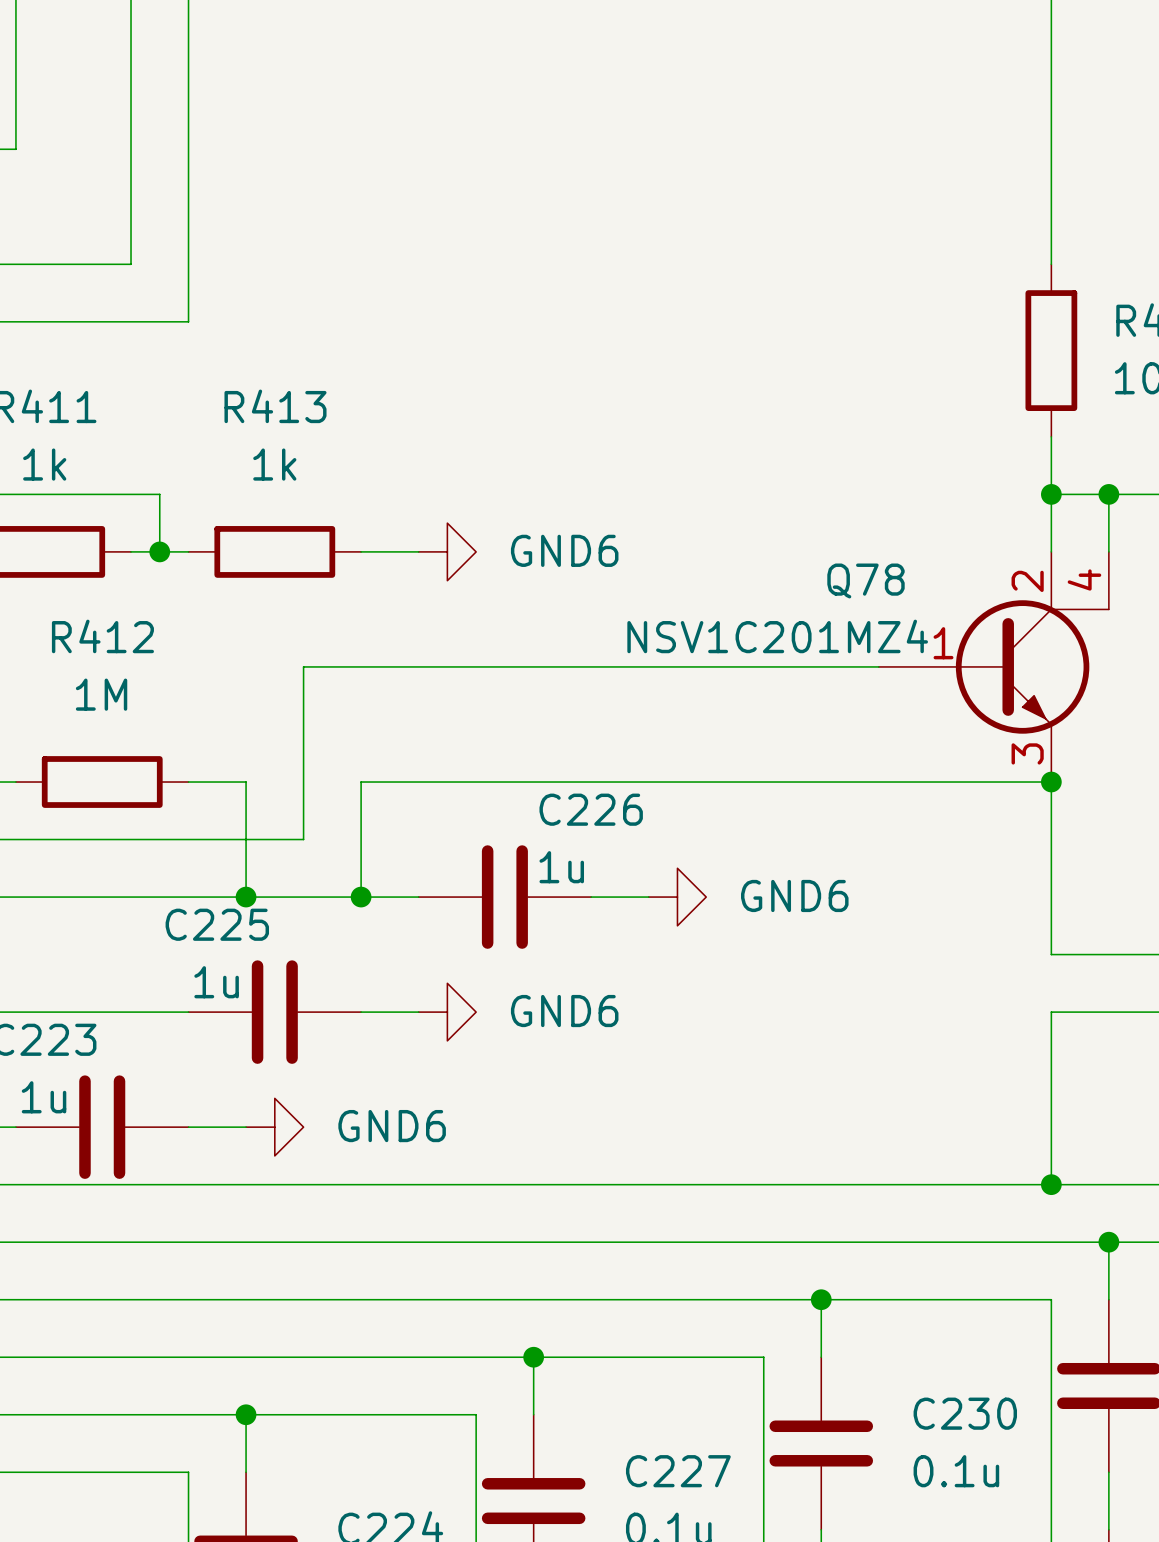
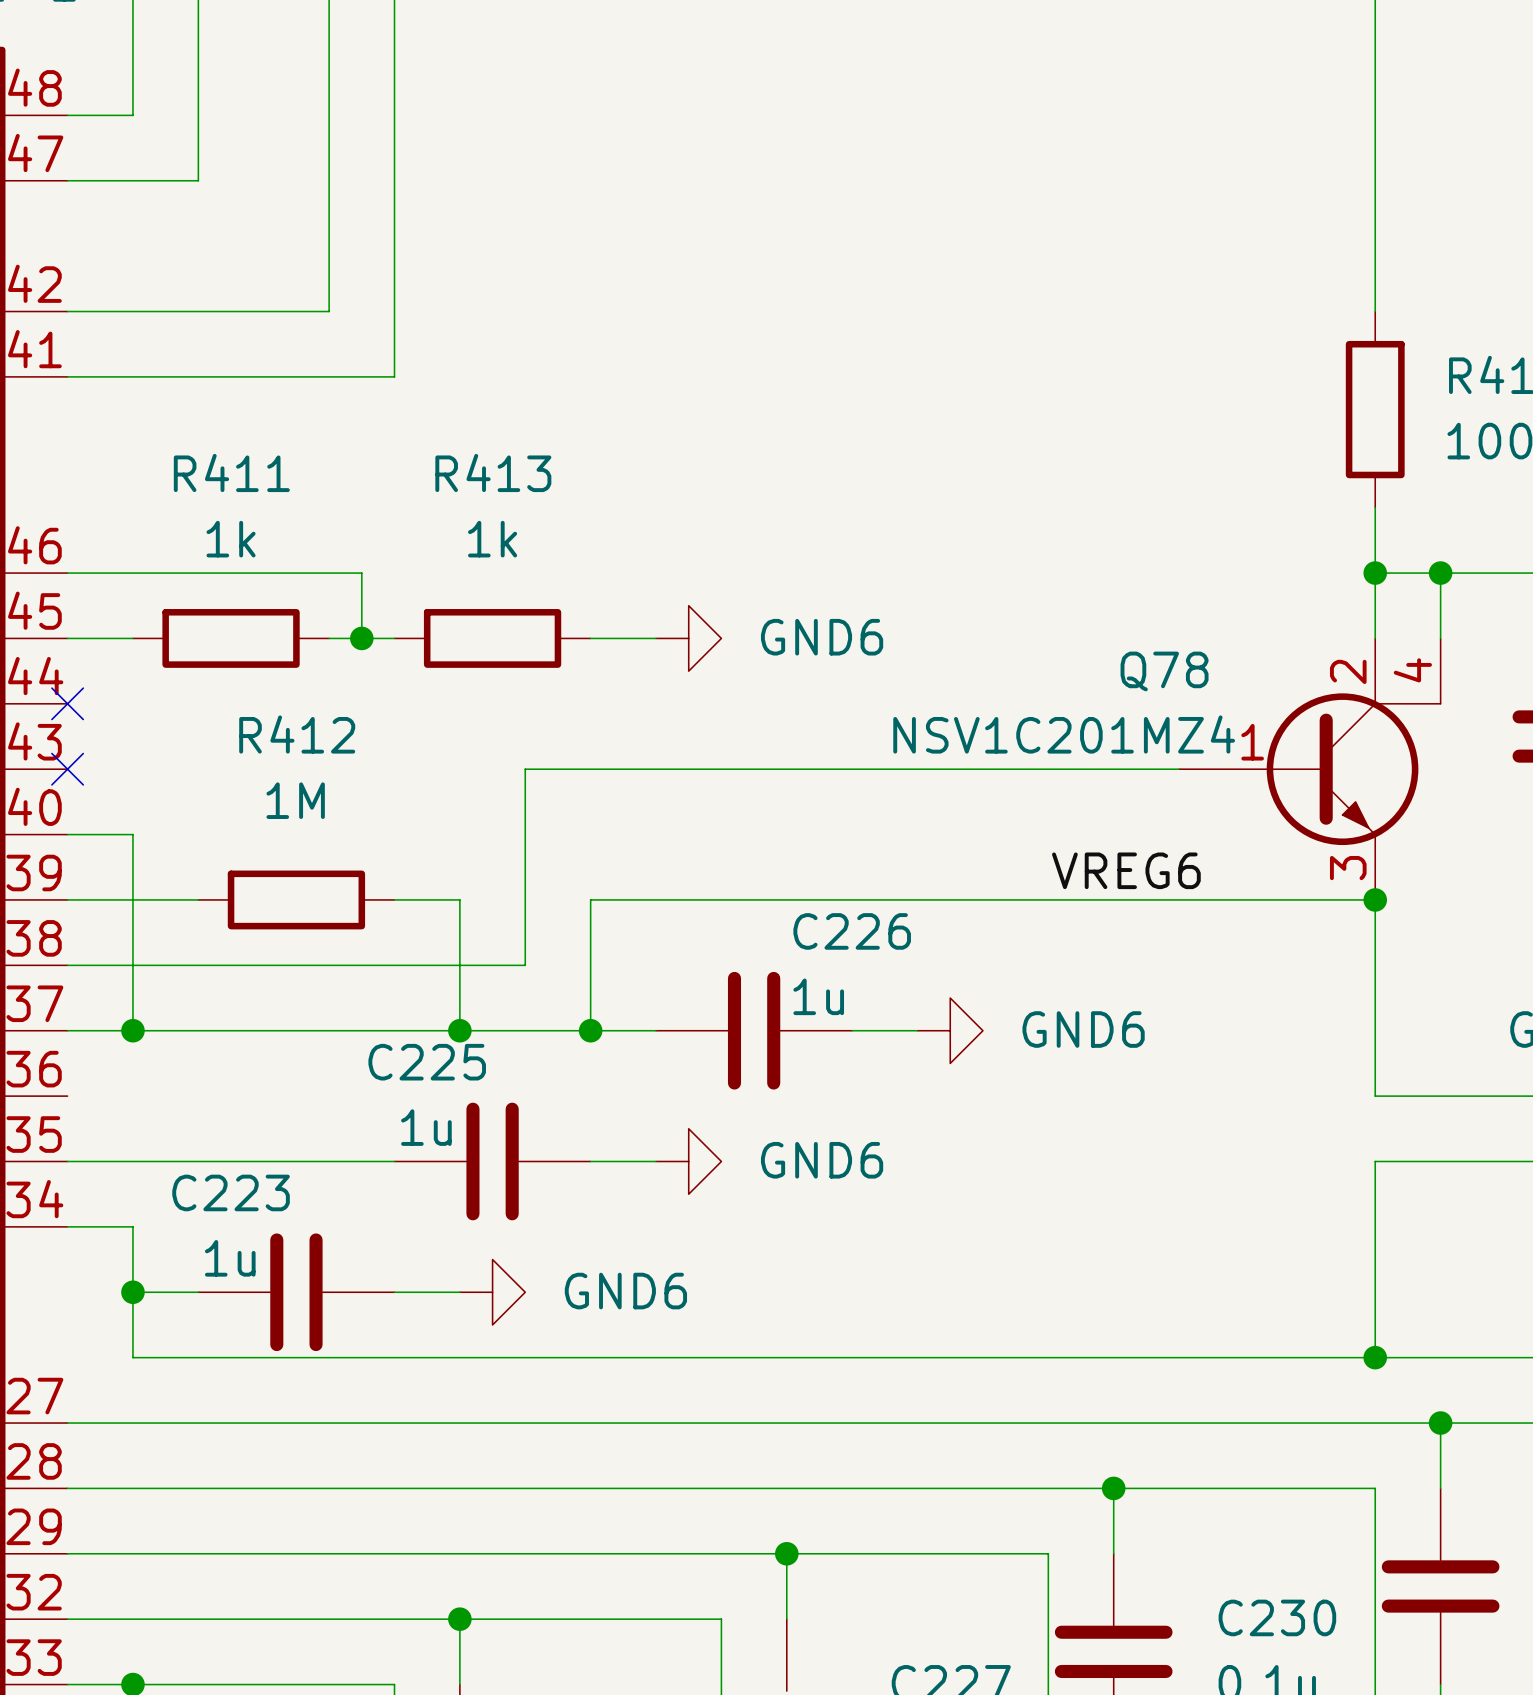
label: none -> VREG6 (1126, 870)

